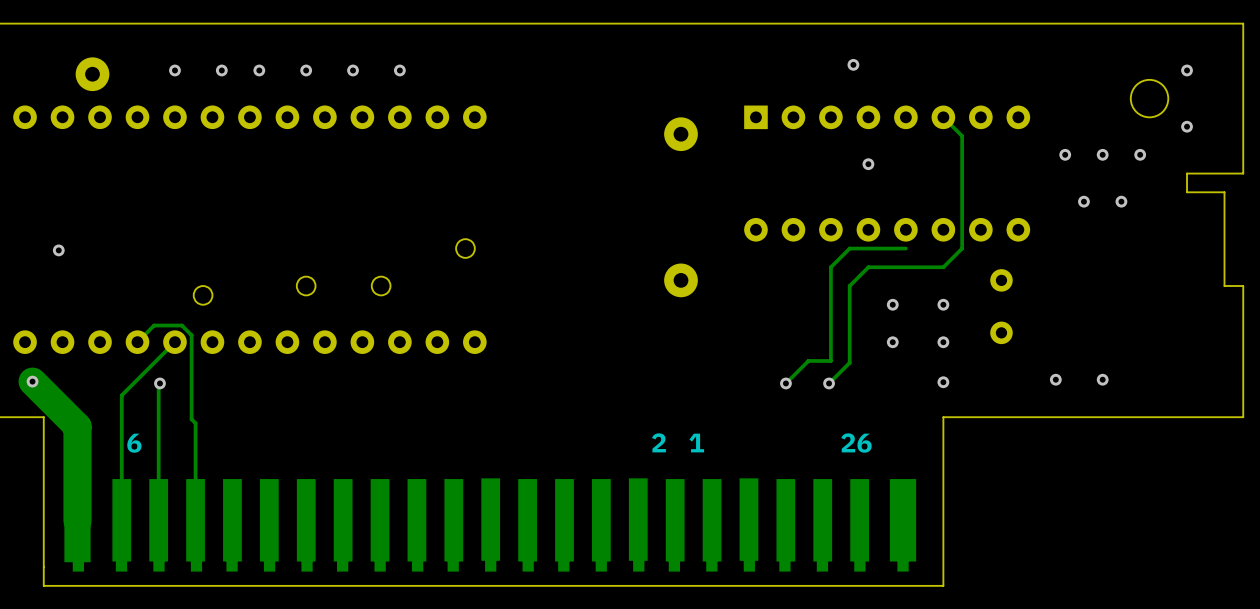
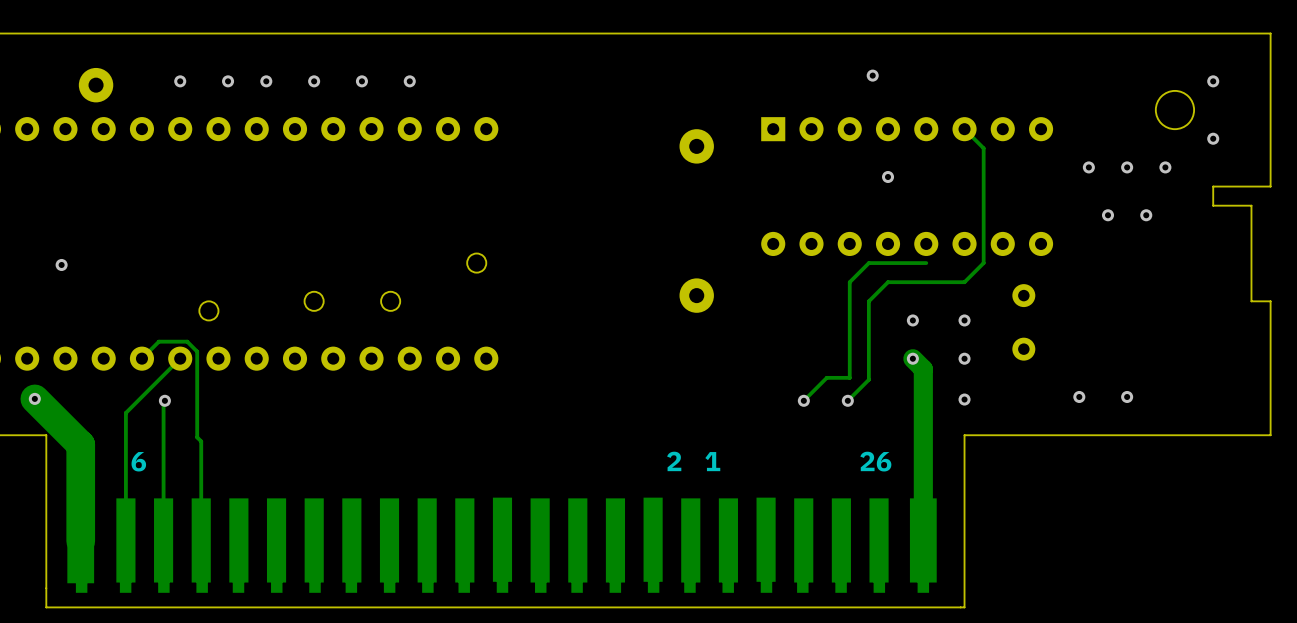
track: none -> (912, 358) (923, 369) (923, 540)

